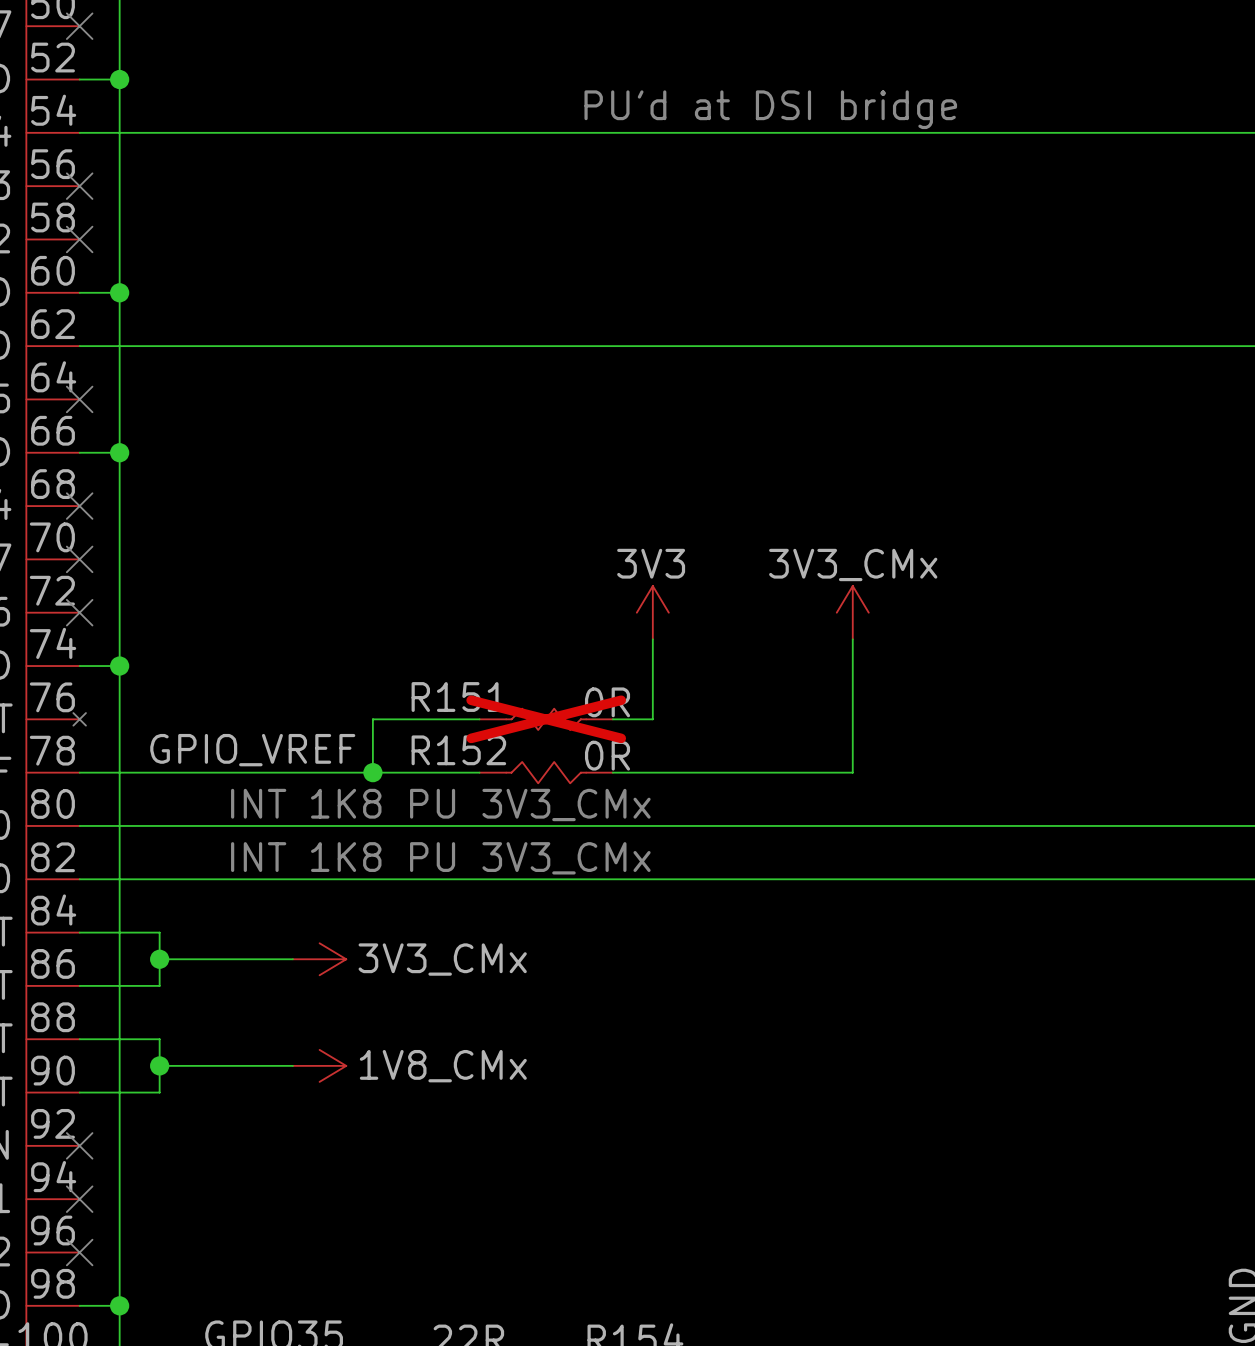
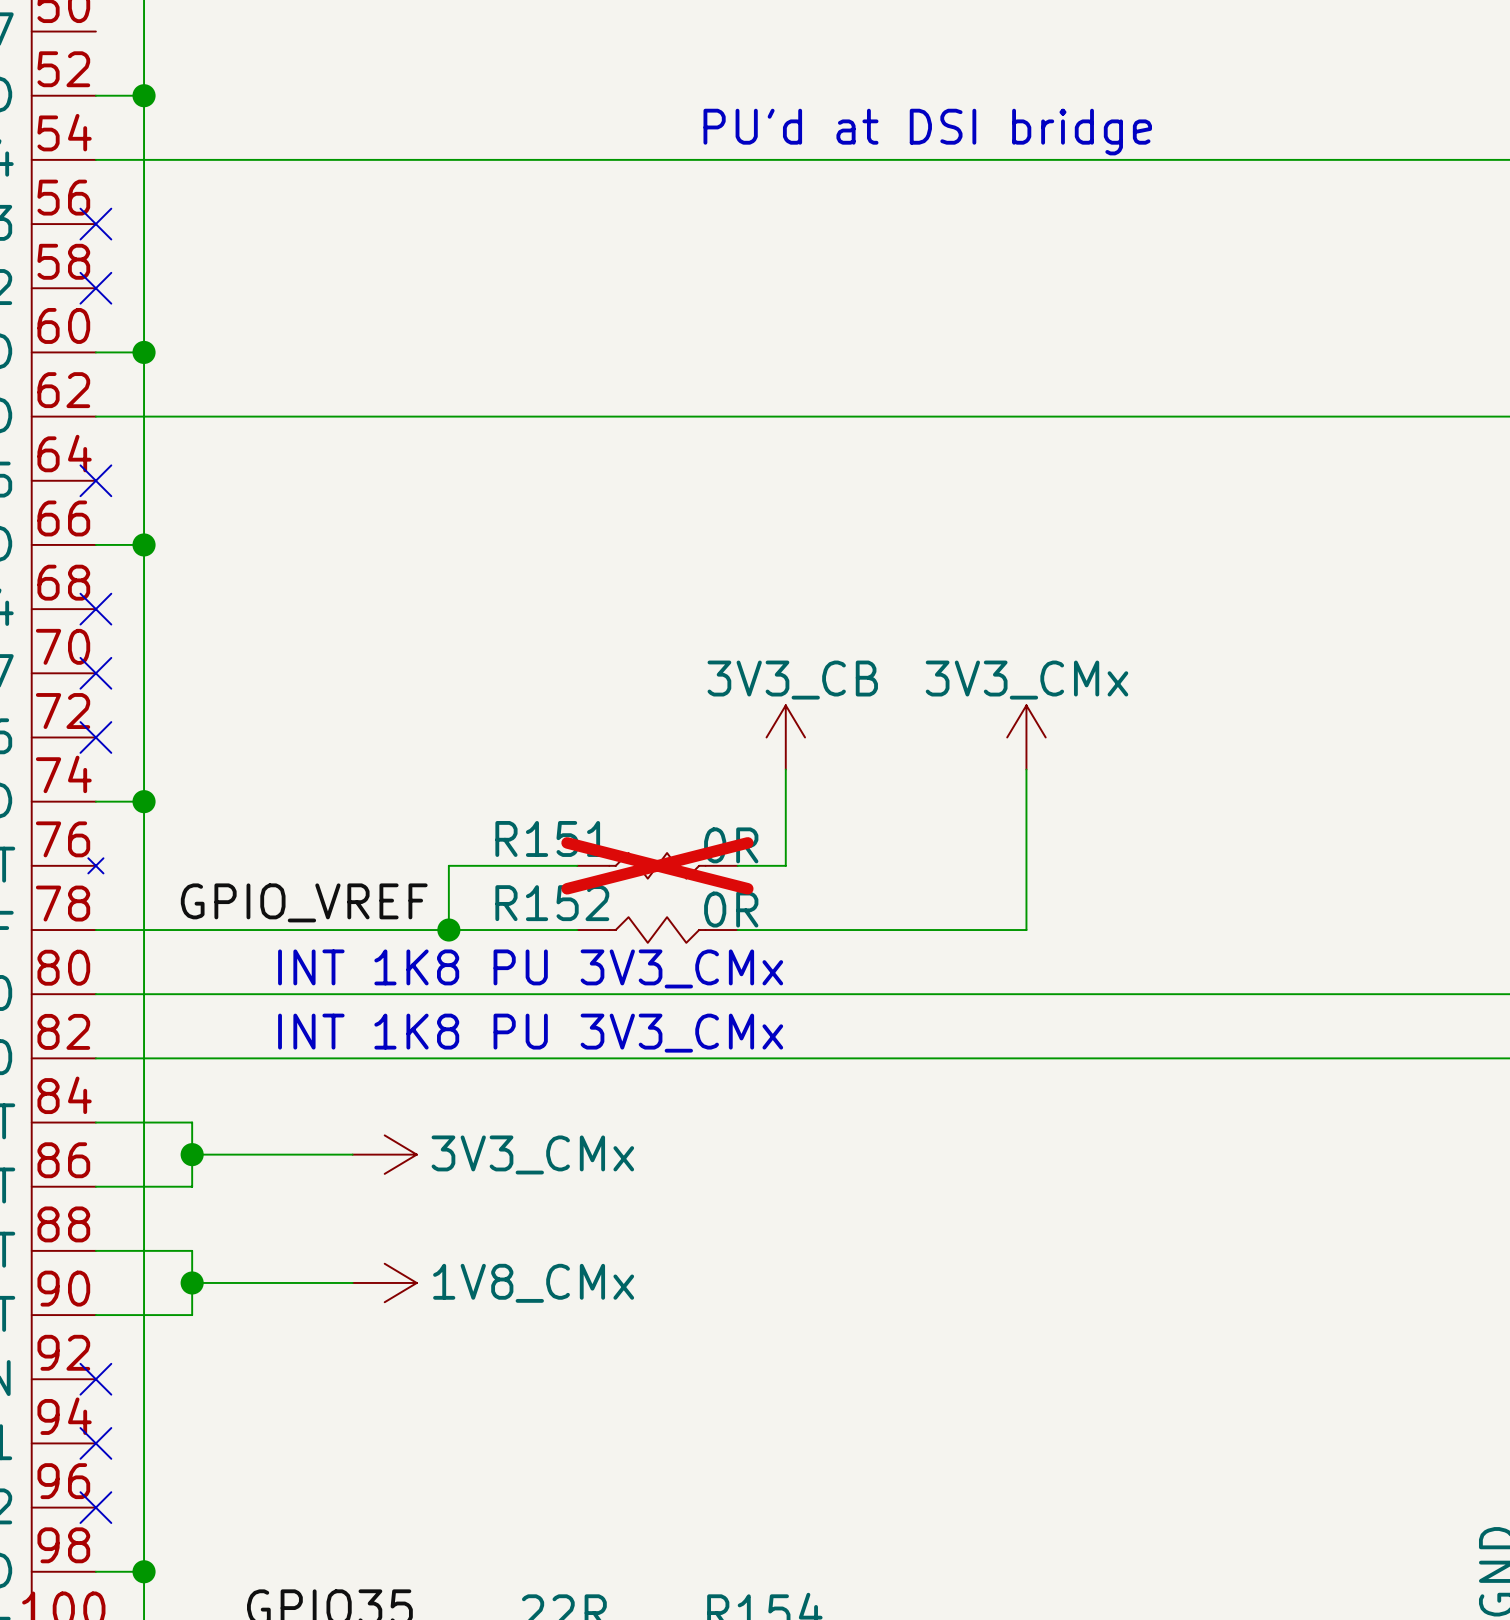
no-connect mark: (79, 26) -> none
power symbol: 3V3 (652, 612) -> 3V3_CB (785, 737)

